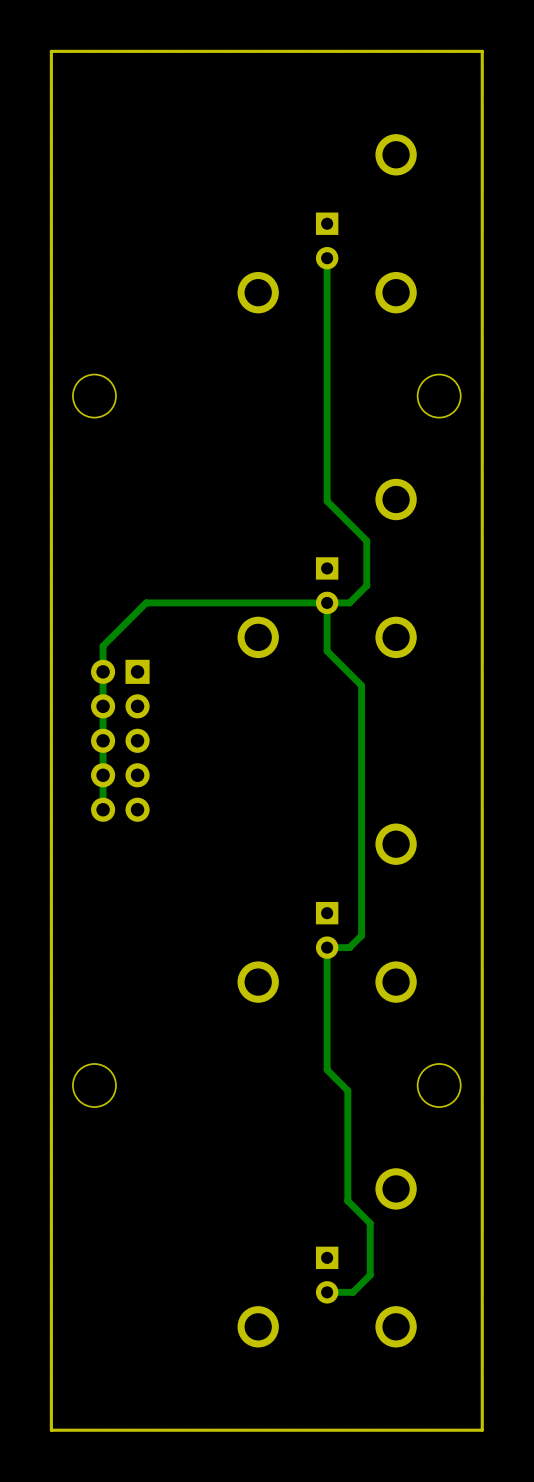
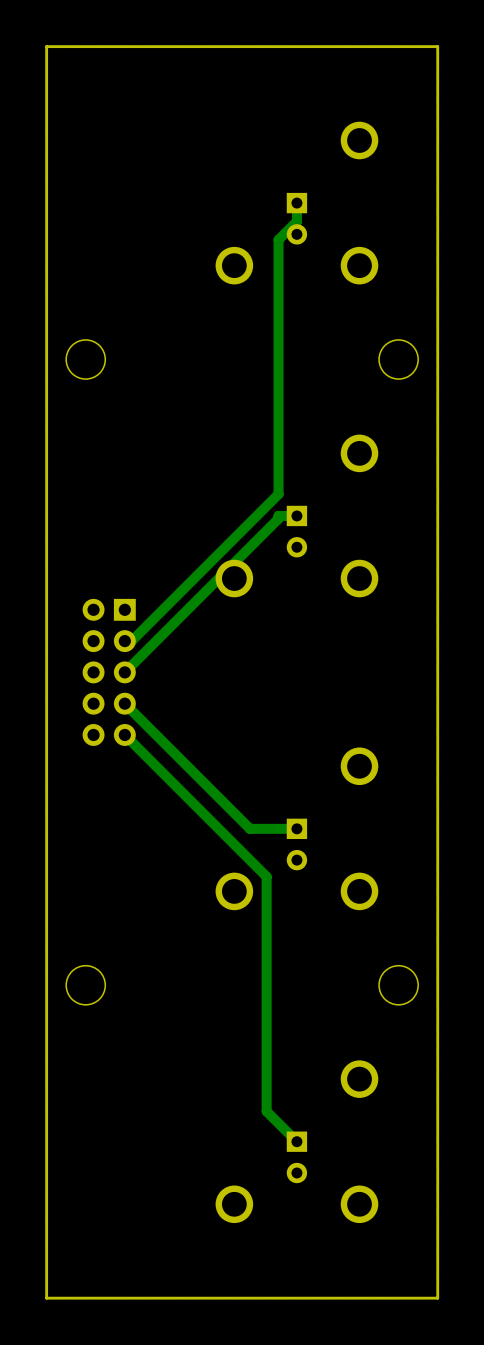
track: none -> (296, 203) (296, 221) (278, 239) (278, 494) (131, 641) (124, 641)
track: (327, 258) (327, 501) (366, 540) (366, 585) (349, 602) (146, 602) (103, 646) (103, 809) -> none
track: none -> (296, 515) (278, 515) (278, 518) (124, 672)
track: (327, 602) (327, 651) (361, 685) (361, 935) (349, 947) (327, 947) (327, 1070) (347, 1090) (347, 1200) (370, 1223) (370, 1275) (353, 1292) (327, 1292) -> none
track: none -> (124, 703) (250, 828) (296, 828)
track: none -> (124, 734) (266, 876) (266, 1111) (296, 1141)

